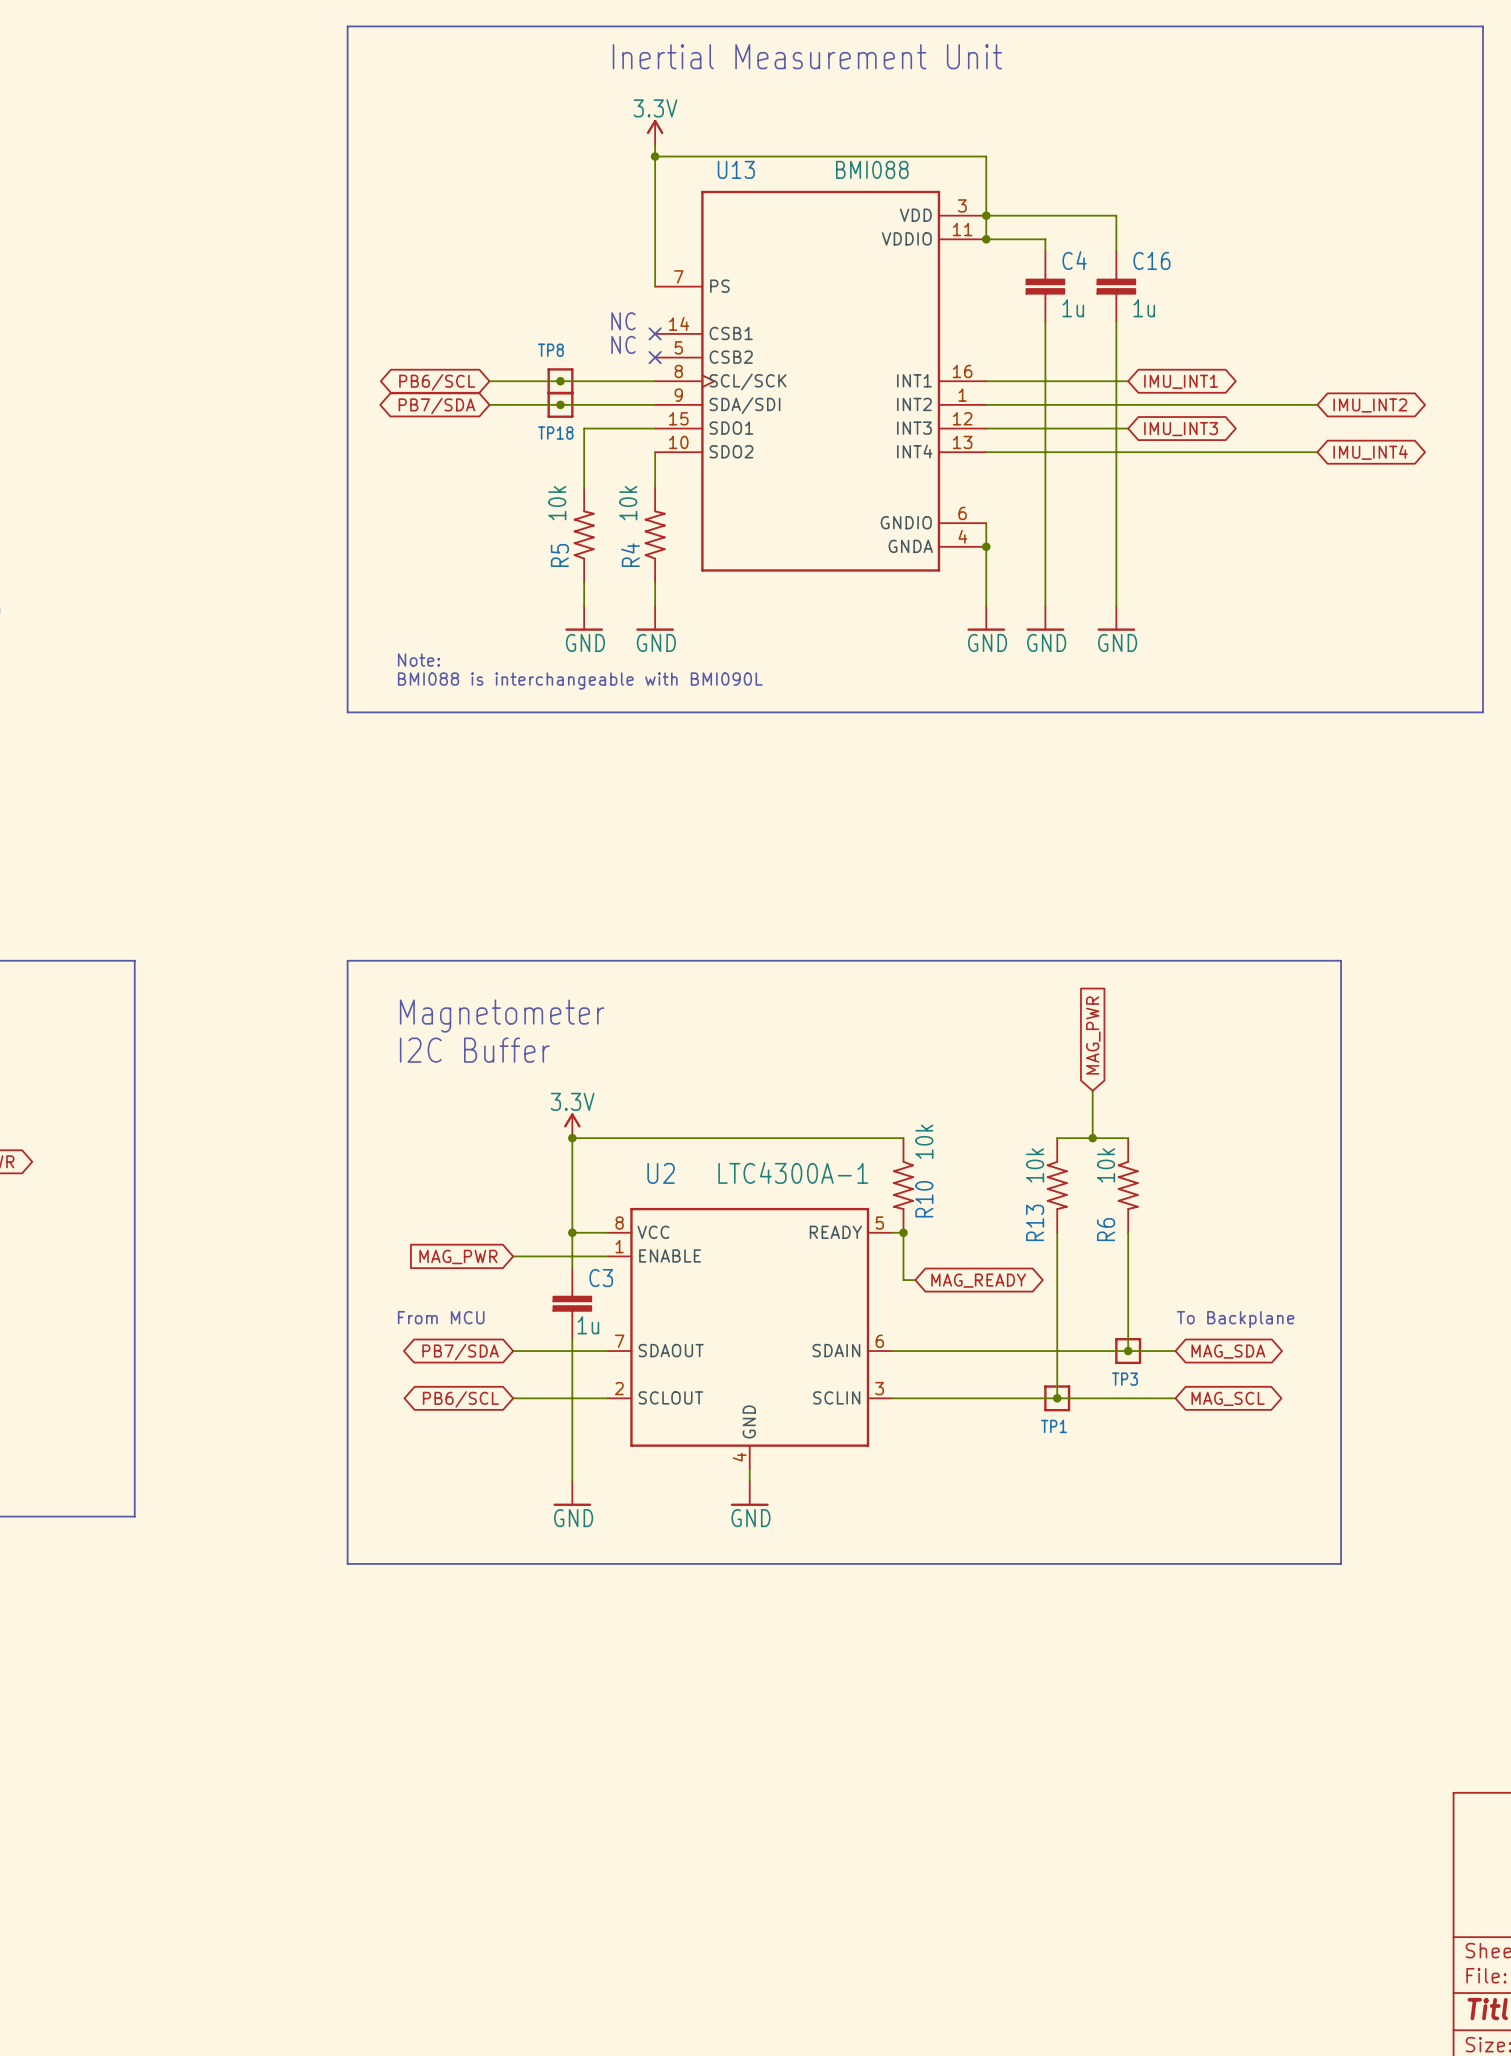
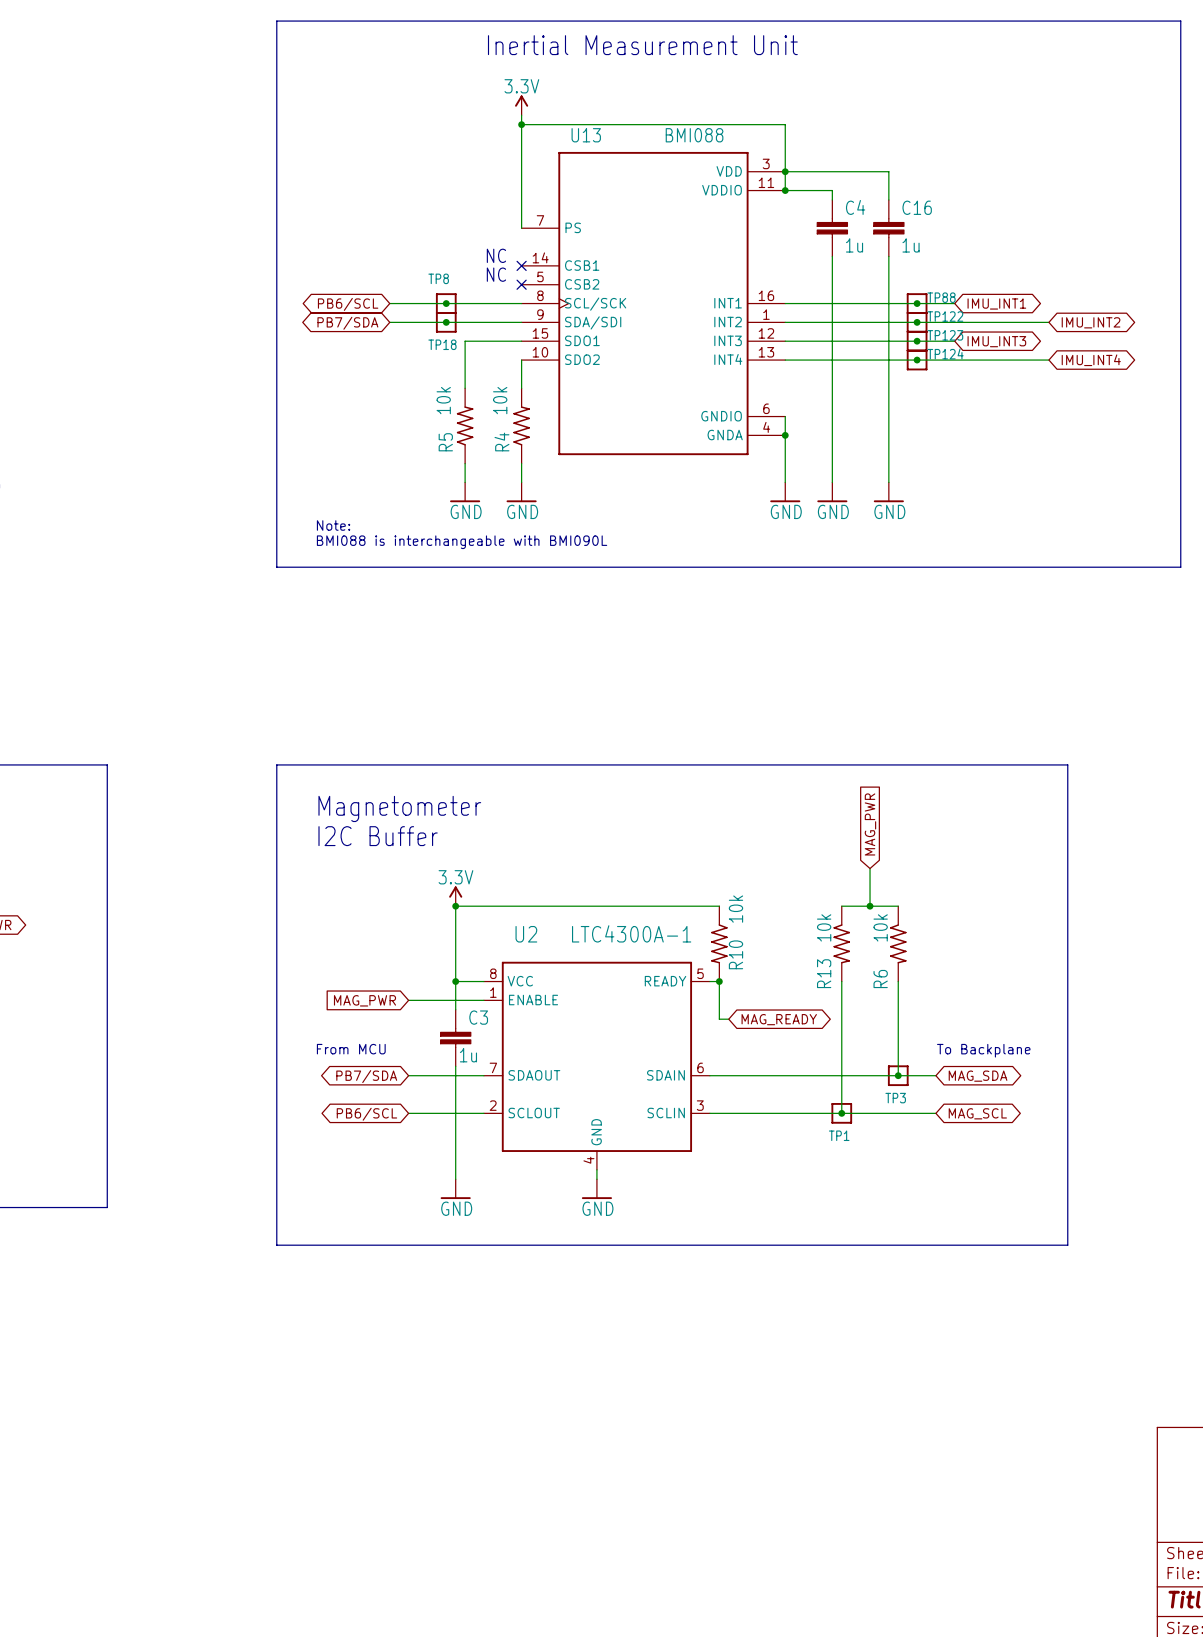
wire: none -> (898, 303) (954, 303)
junction: none -> (917, 303)
TP88: none -> (917, 303)
global label position: IMU_INT1 (1181, 381) -> IMU_INT1 (996, 303)
junction: none -> (917, 322)
TP122: none -> (917, 322)
wire: none -> (898, 341) (954, 341)
junction: none -> (917, 341)
TP123: none -> (917, 341)
global label position: IMU_INT3 (1181, 429) -> IMU_INT3 (996, 341)
junction: none -> (917, 360)
TP124: none -> (917, 360)

